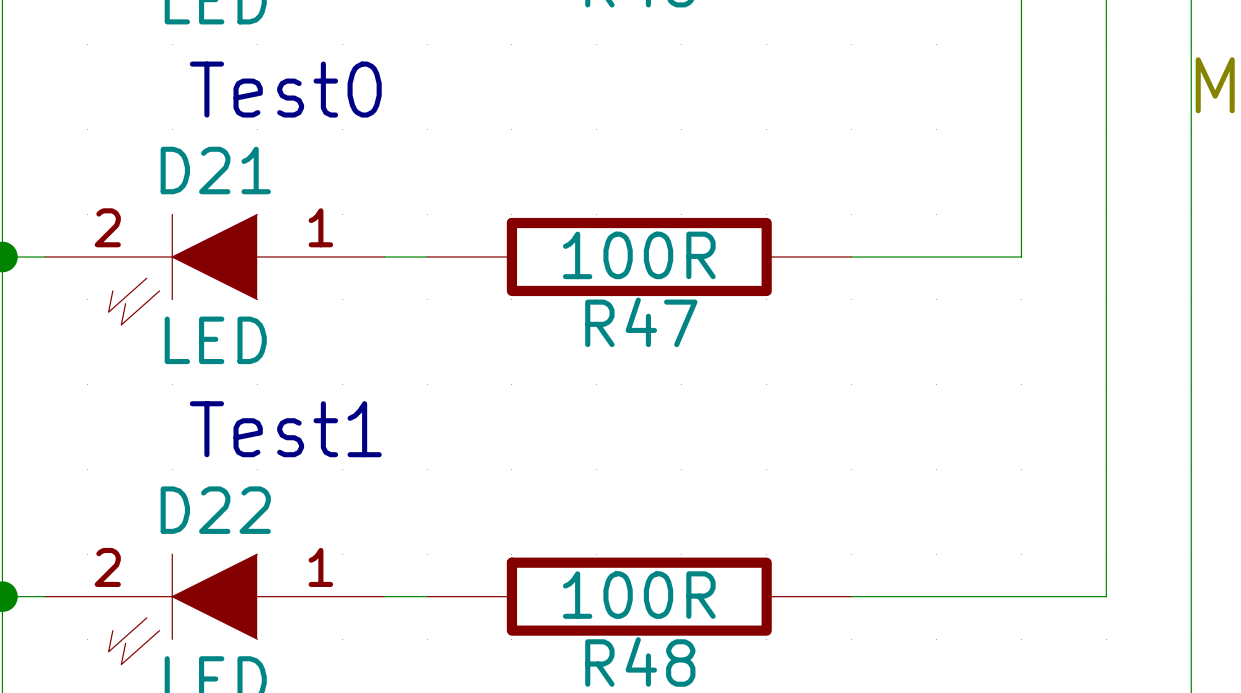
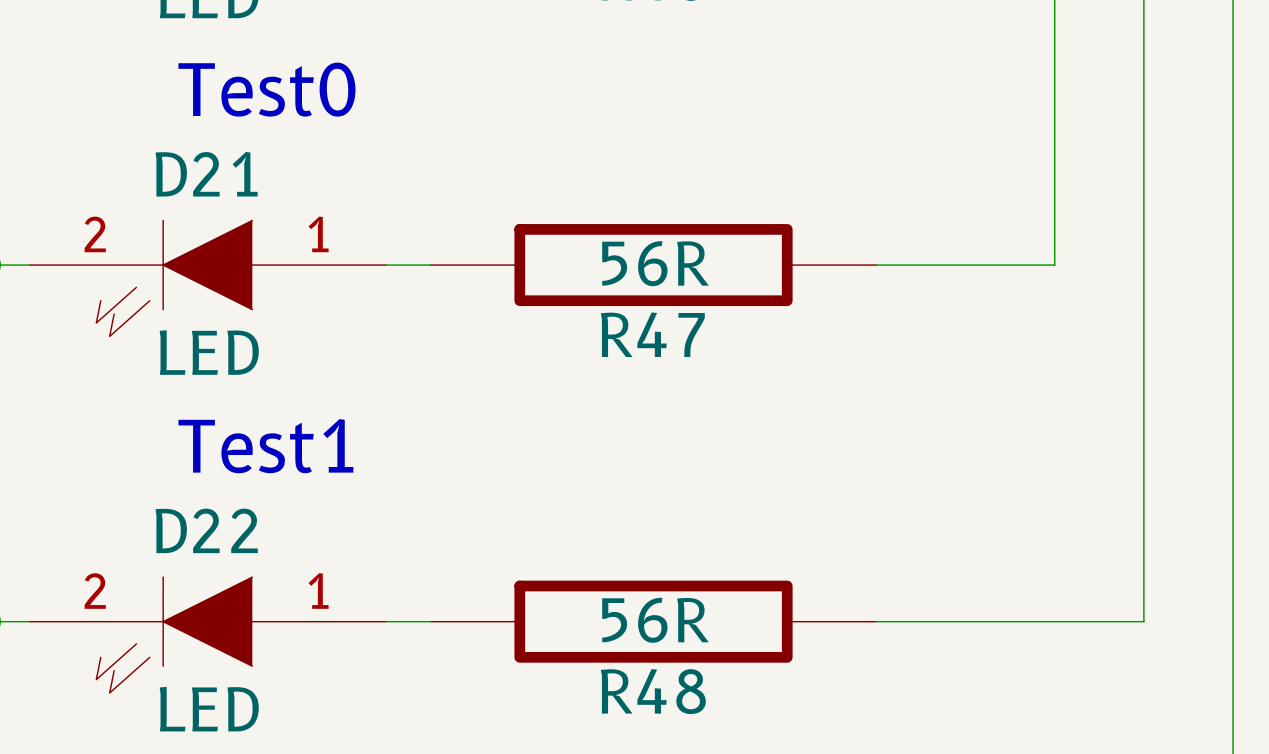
R47 value: 100R (639, 255) -> 56R (655, 263)
R48 value: 100R (639, 595) -> 56R (655, 620)

